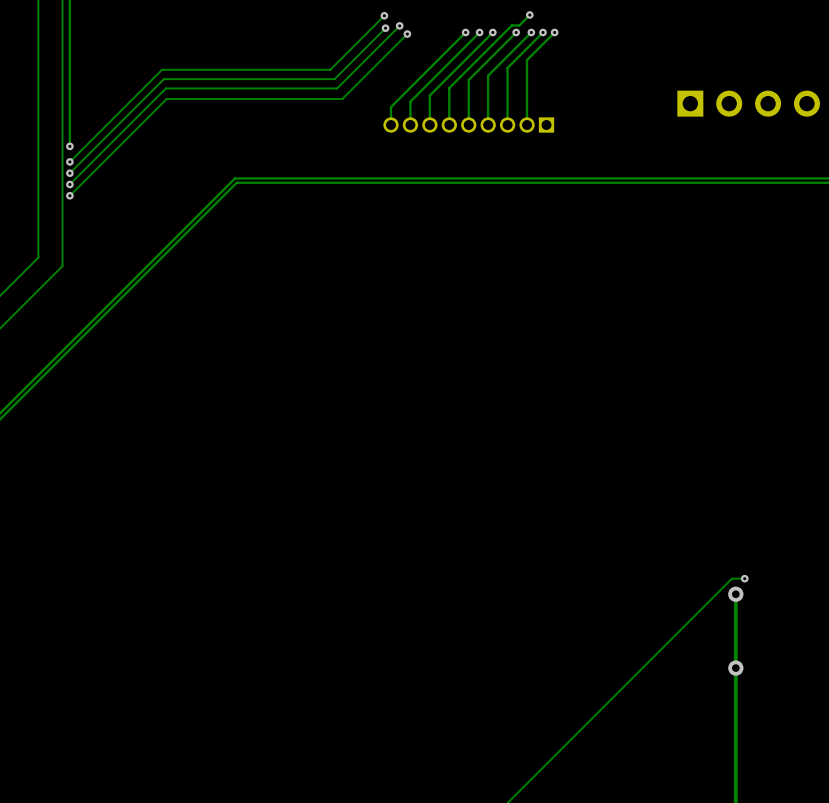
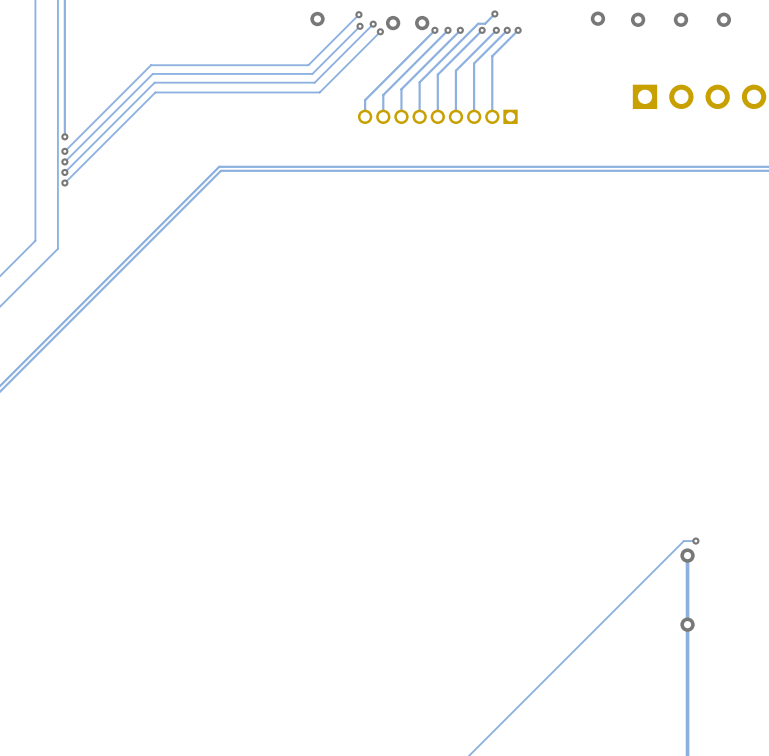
via: none -> (317, 19)
via: none -> (597, 18)
via: none -> (638, 19)
via: none -> (680, 19)
via: none -> (723, 19)
via: none -> (393, 23)
via: none -> (422, 23)

